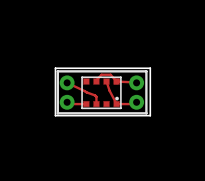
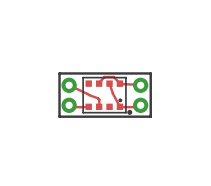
board edge: (55, 68) (150, 68) (150, 115) (55, 115) (55, 68) -> none
part footprint: [81, 76, 122, 109] -> [82, 77, 127, 114]
drawing: none -> [127, 109, 133, 115]

